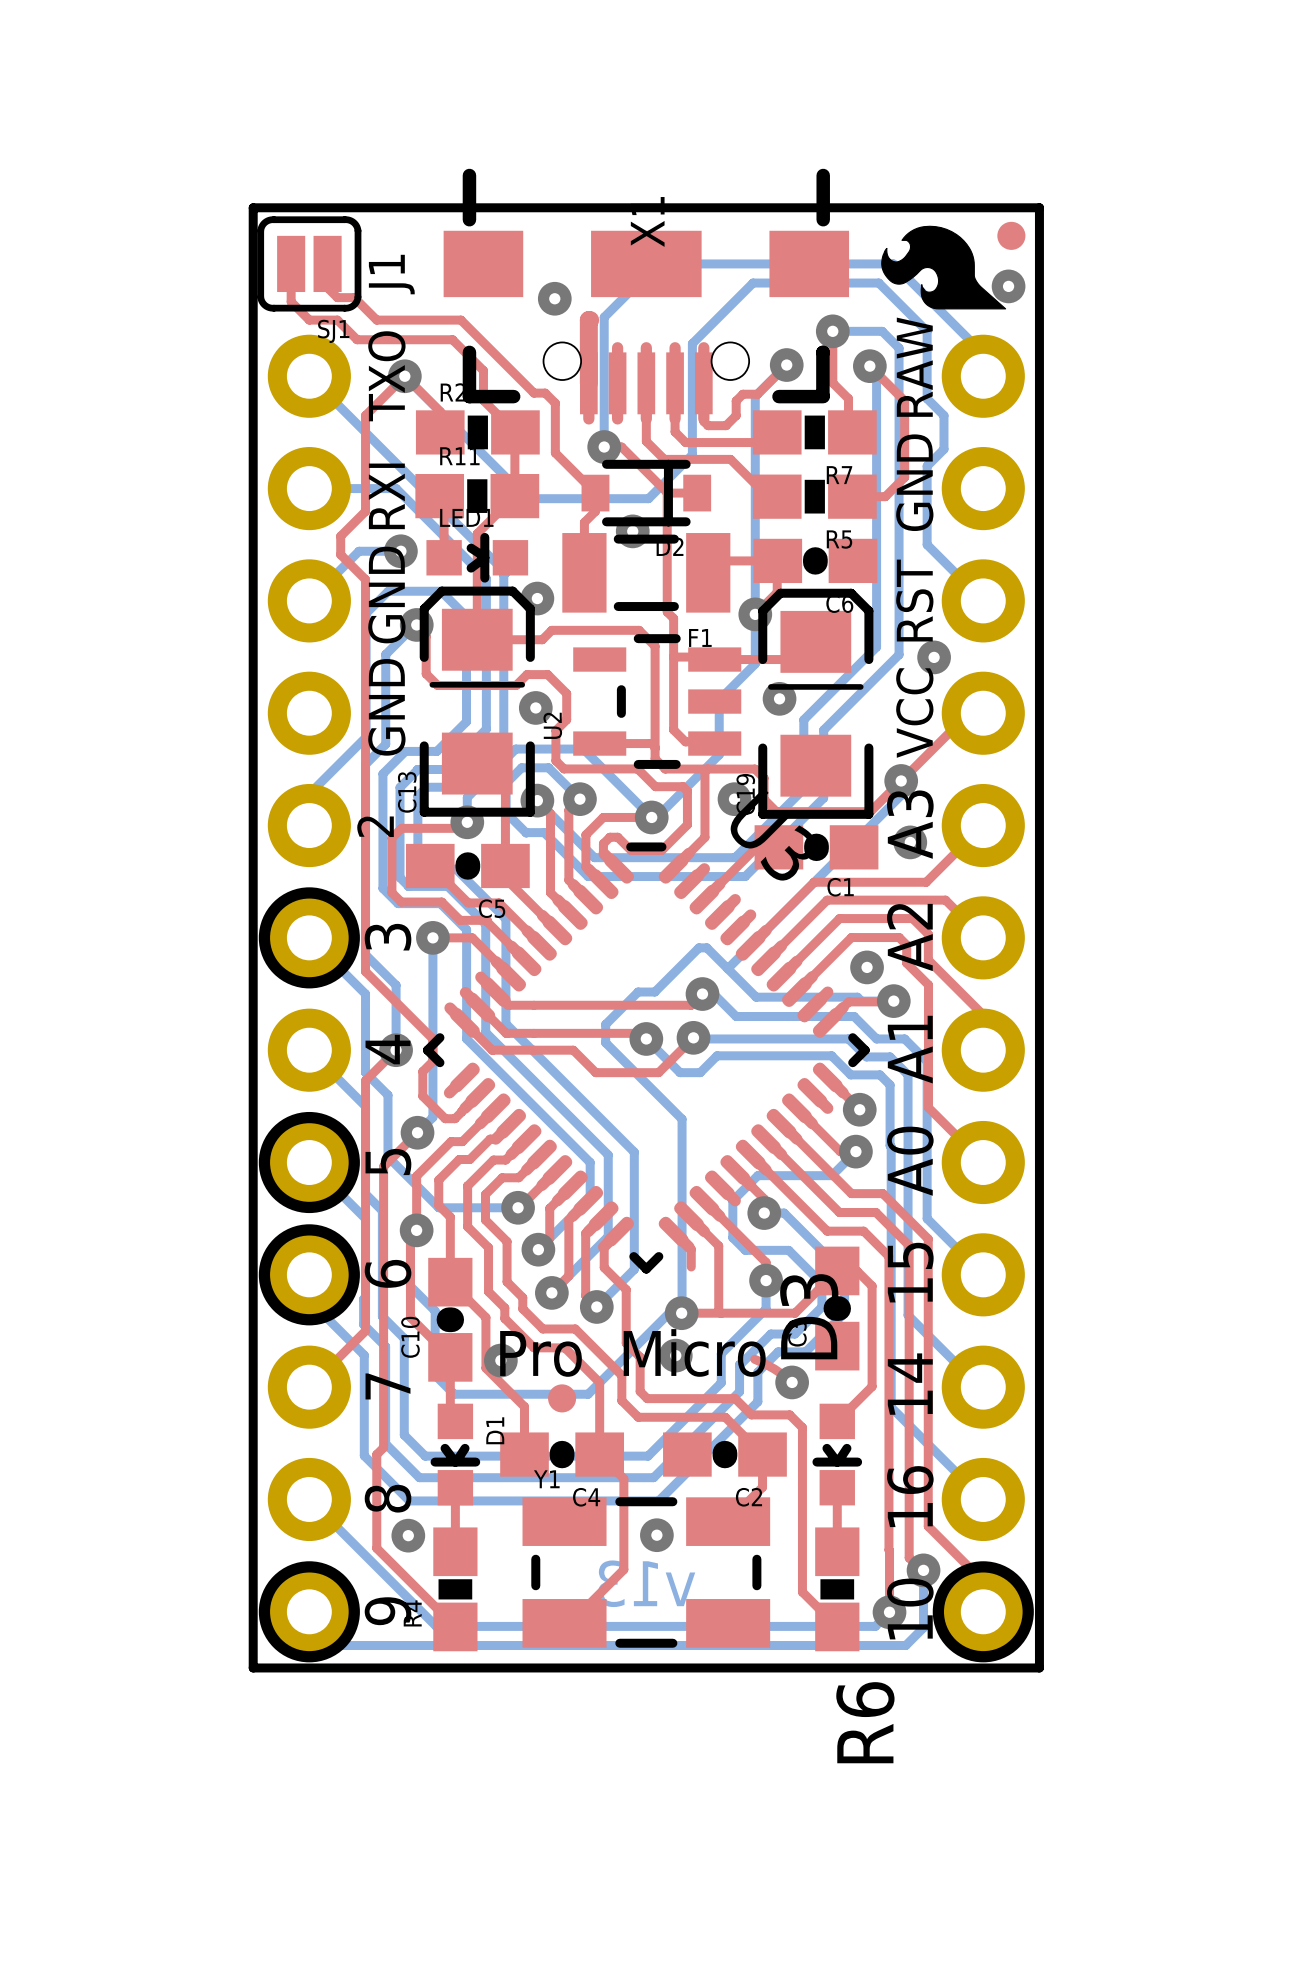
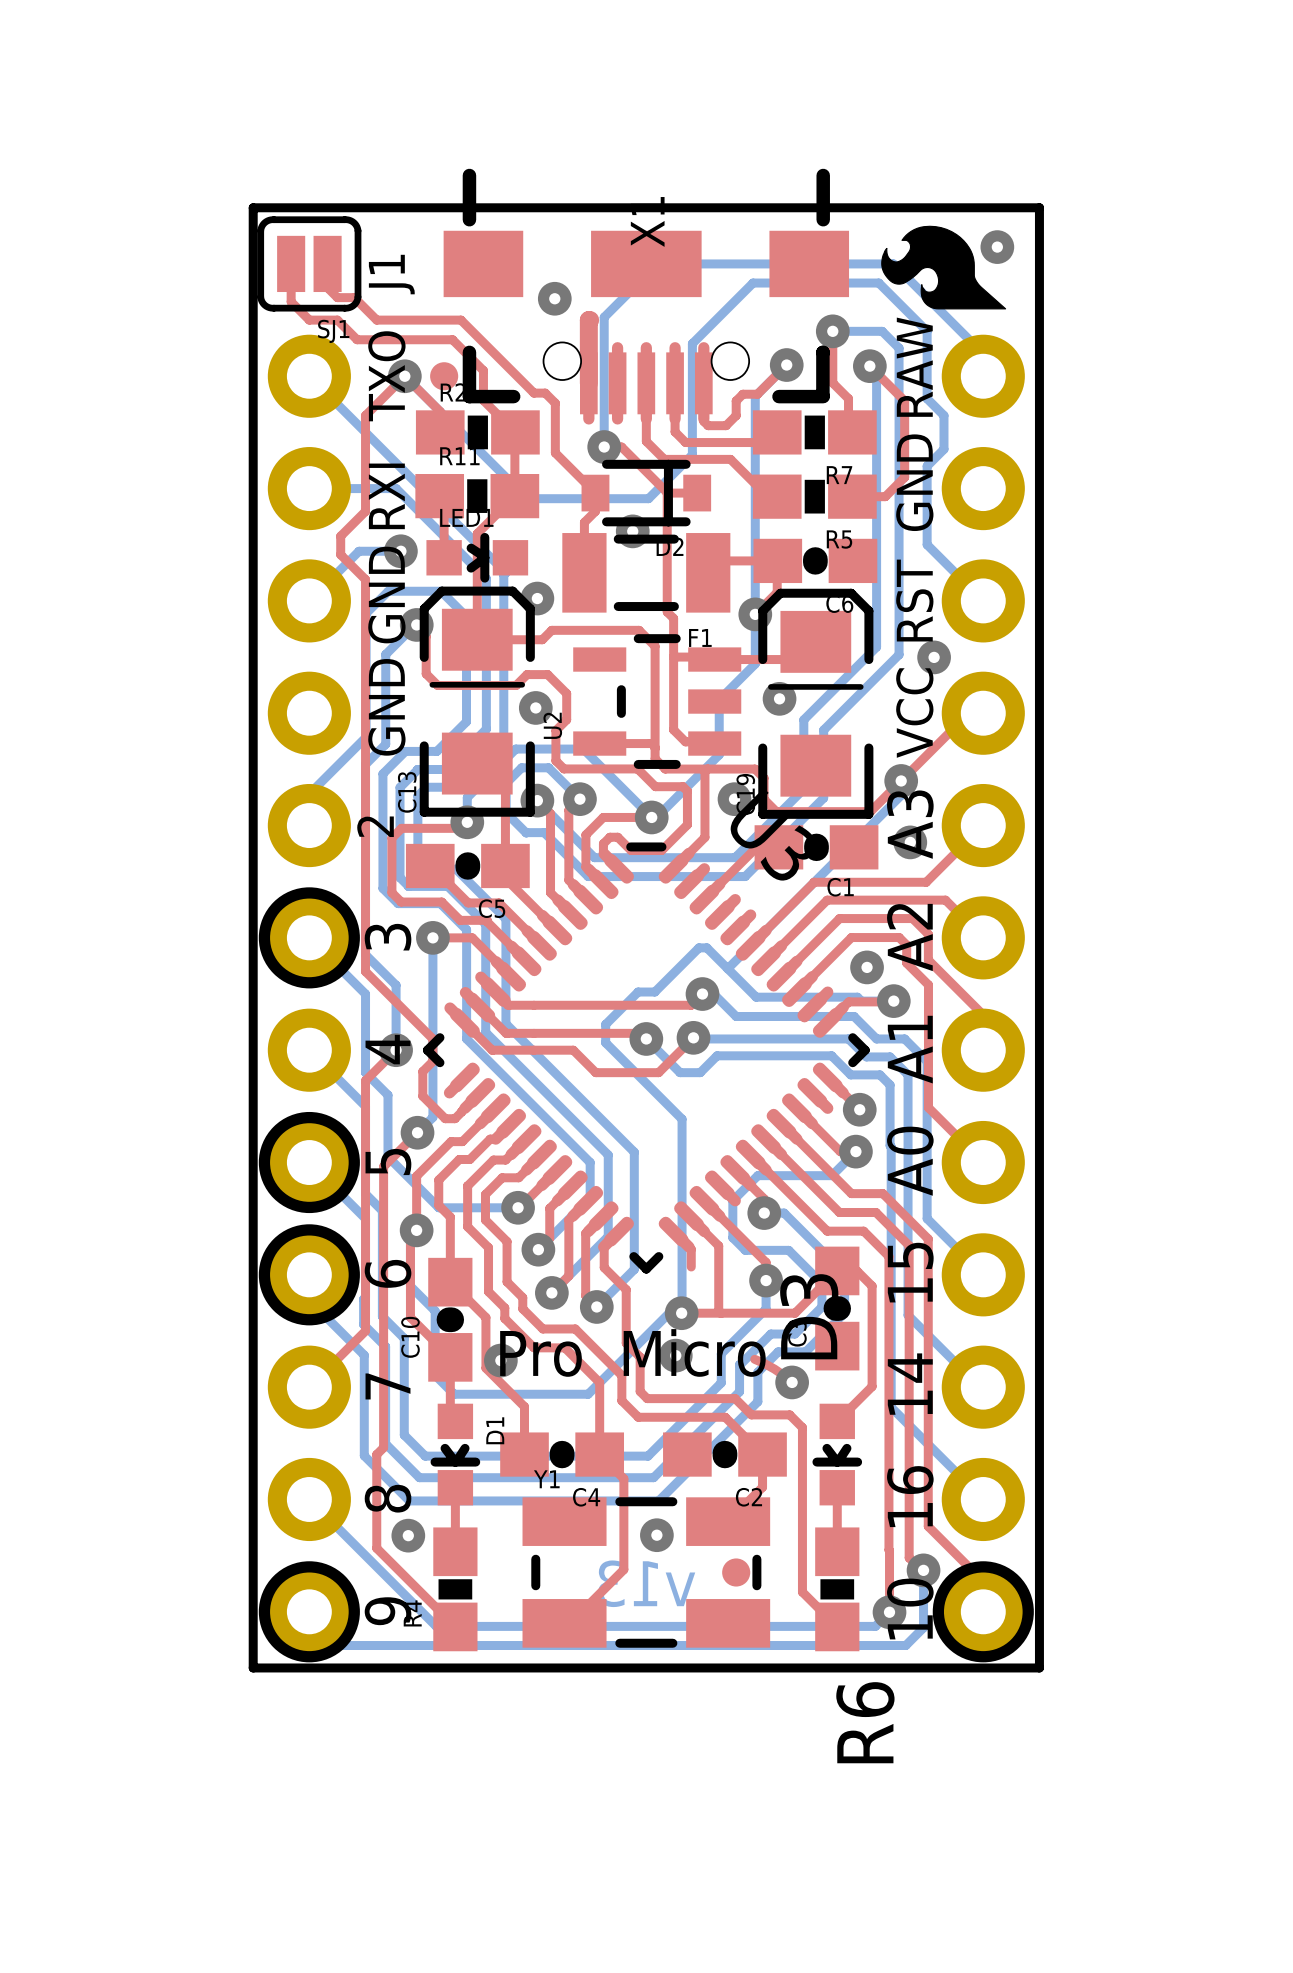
part: (1011, 235) -> none
via position: (1008, 286) -> (997, 247)
part: none -> (444, 376)
part position: (562, 1398) -> (736, 1572)

